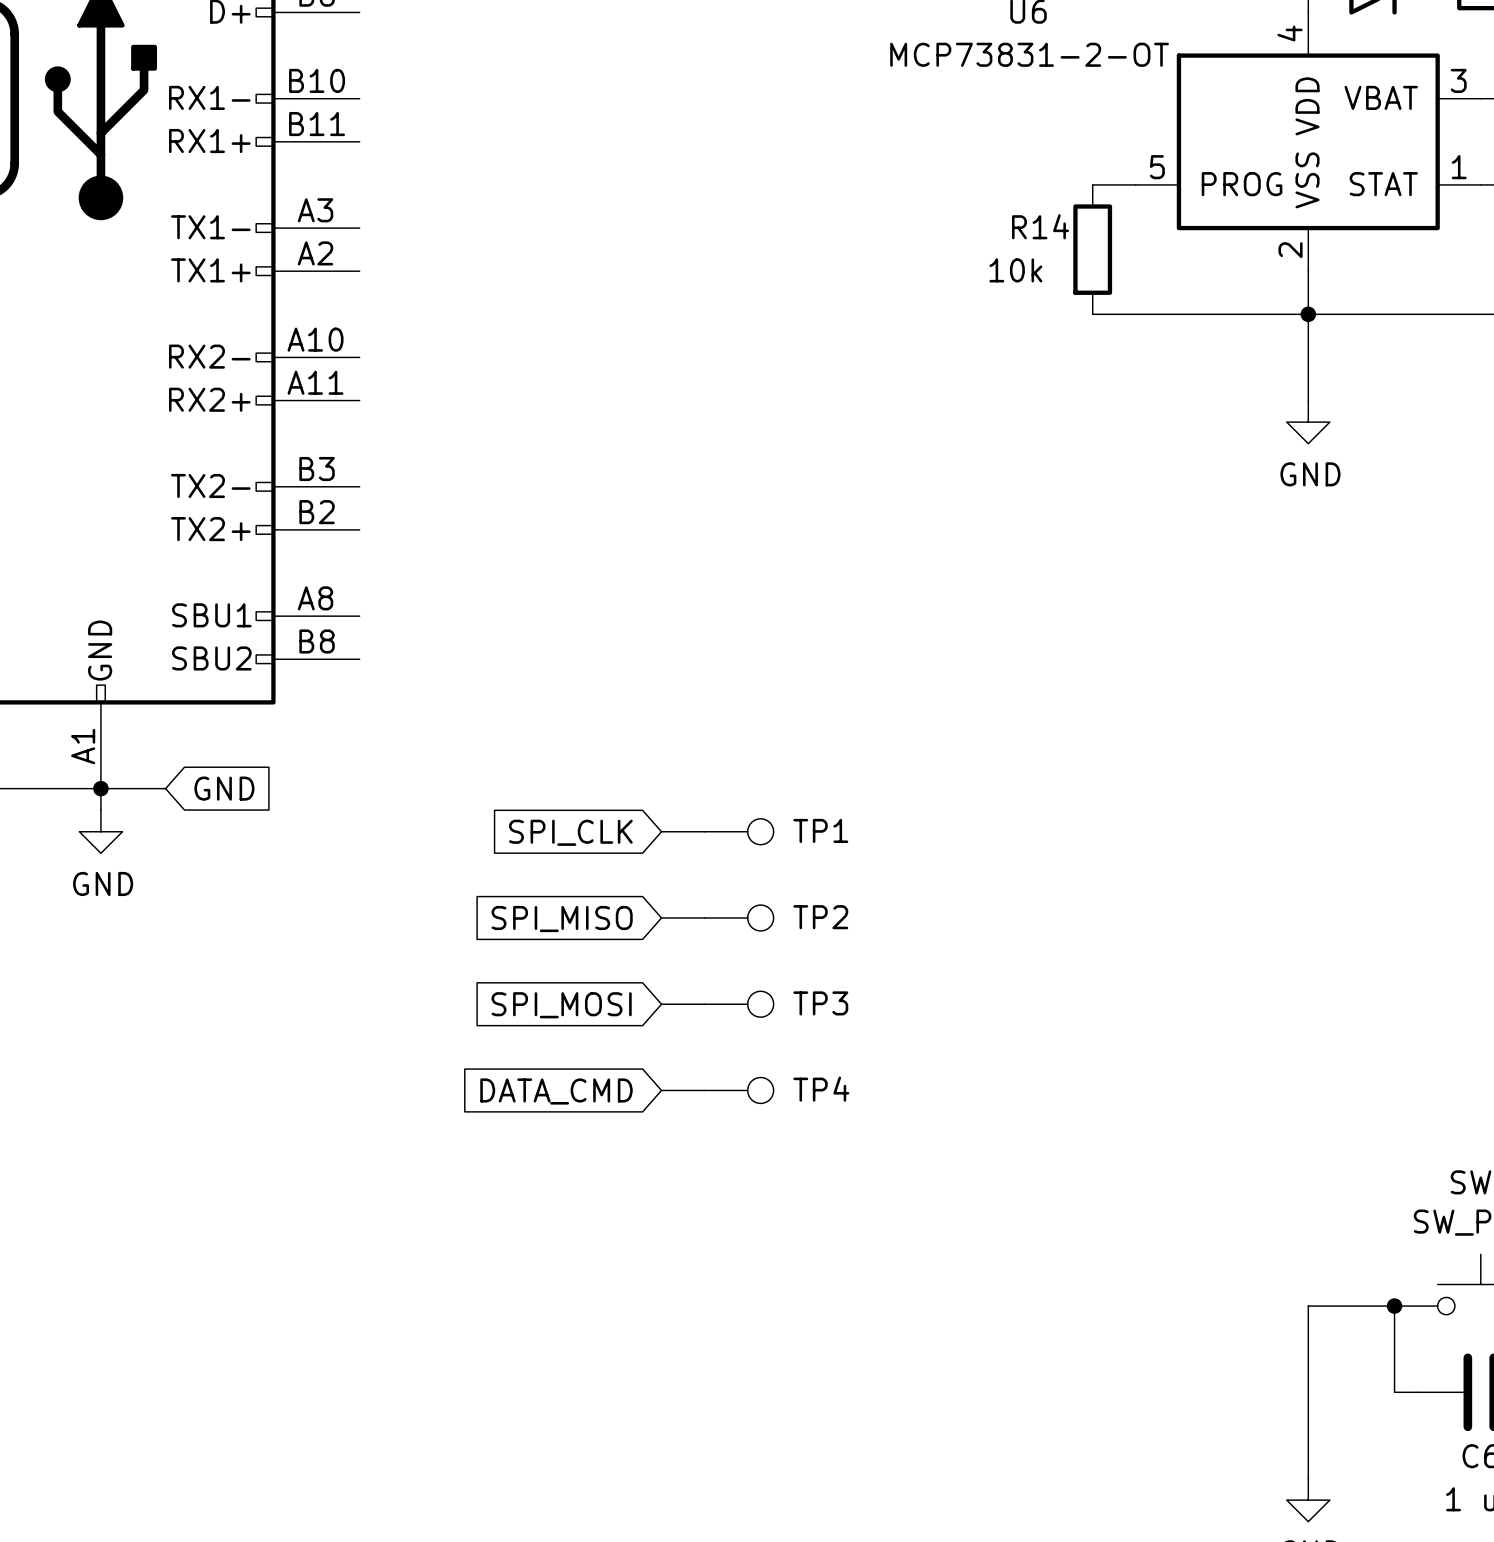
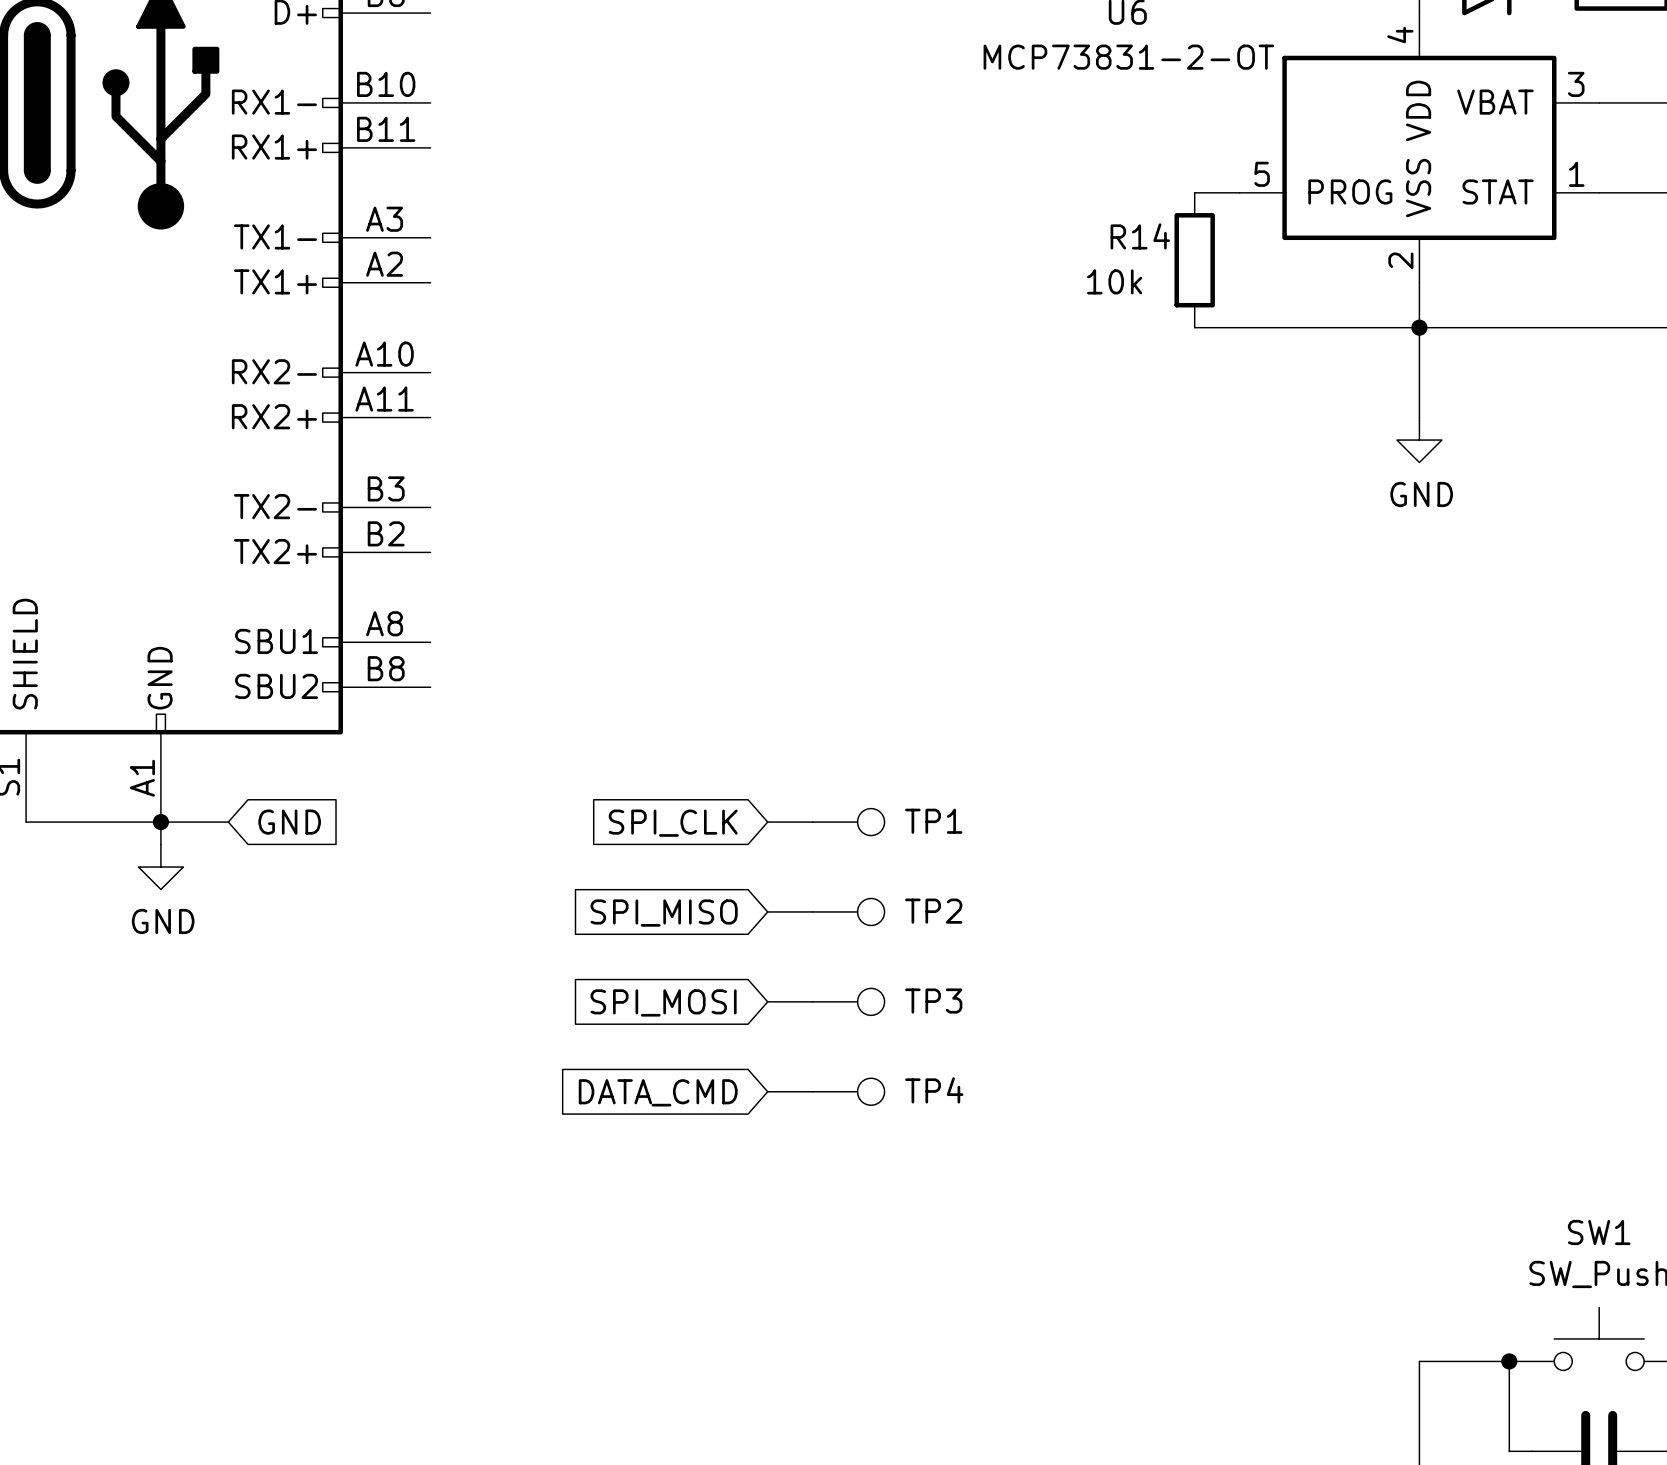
wire: (661, 831) (704, 831) -> (767, 822) (812, 822)
TP1 position: (739, 831) -> (848, 822)
global label position: SPI_CLK (570, 832) -> SPI_CLK (673, 823)
wire: (661, 917) (704, 917) -> (767, 1001) (812, 1001)
TP2 position: (739, 917) -> (848, 911)
global label position: SPI_MISO (562, 919) -> SPI_MISO (664, 913)
wire: (661, 1004) (704, 1004) -> (767, 1091) (812, 1091)
TP3 position: (739, 1004) -> (848, 1001)
global label position: SPI_MOSI (561, 1005) -> SPI_MOSI (663, 1002)
wire: (661, 1090) (704, 1090) -> (767, 911) (812, 911)
TP4 position: (739, 1090) -> (848, 1091)
global label position: DATA_CMD (556, 1091) -> DATA_CMD (658, 1092)

